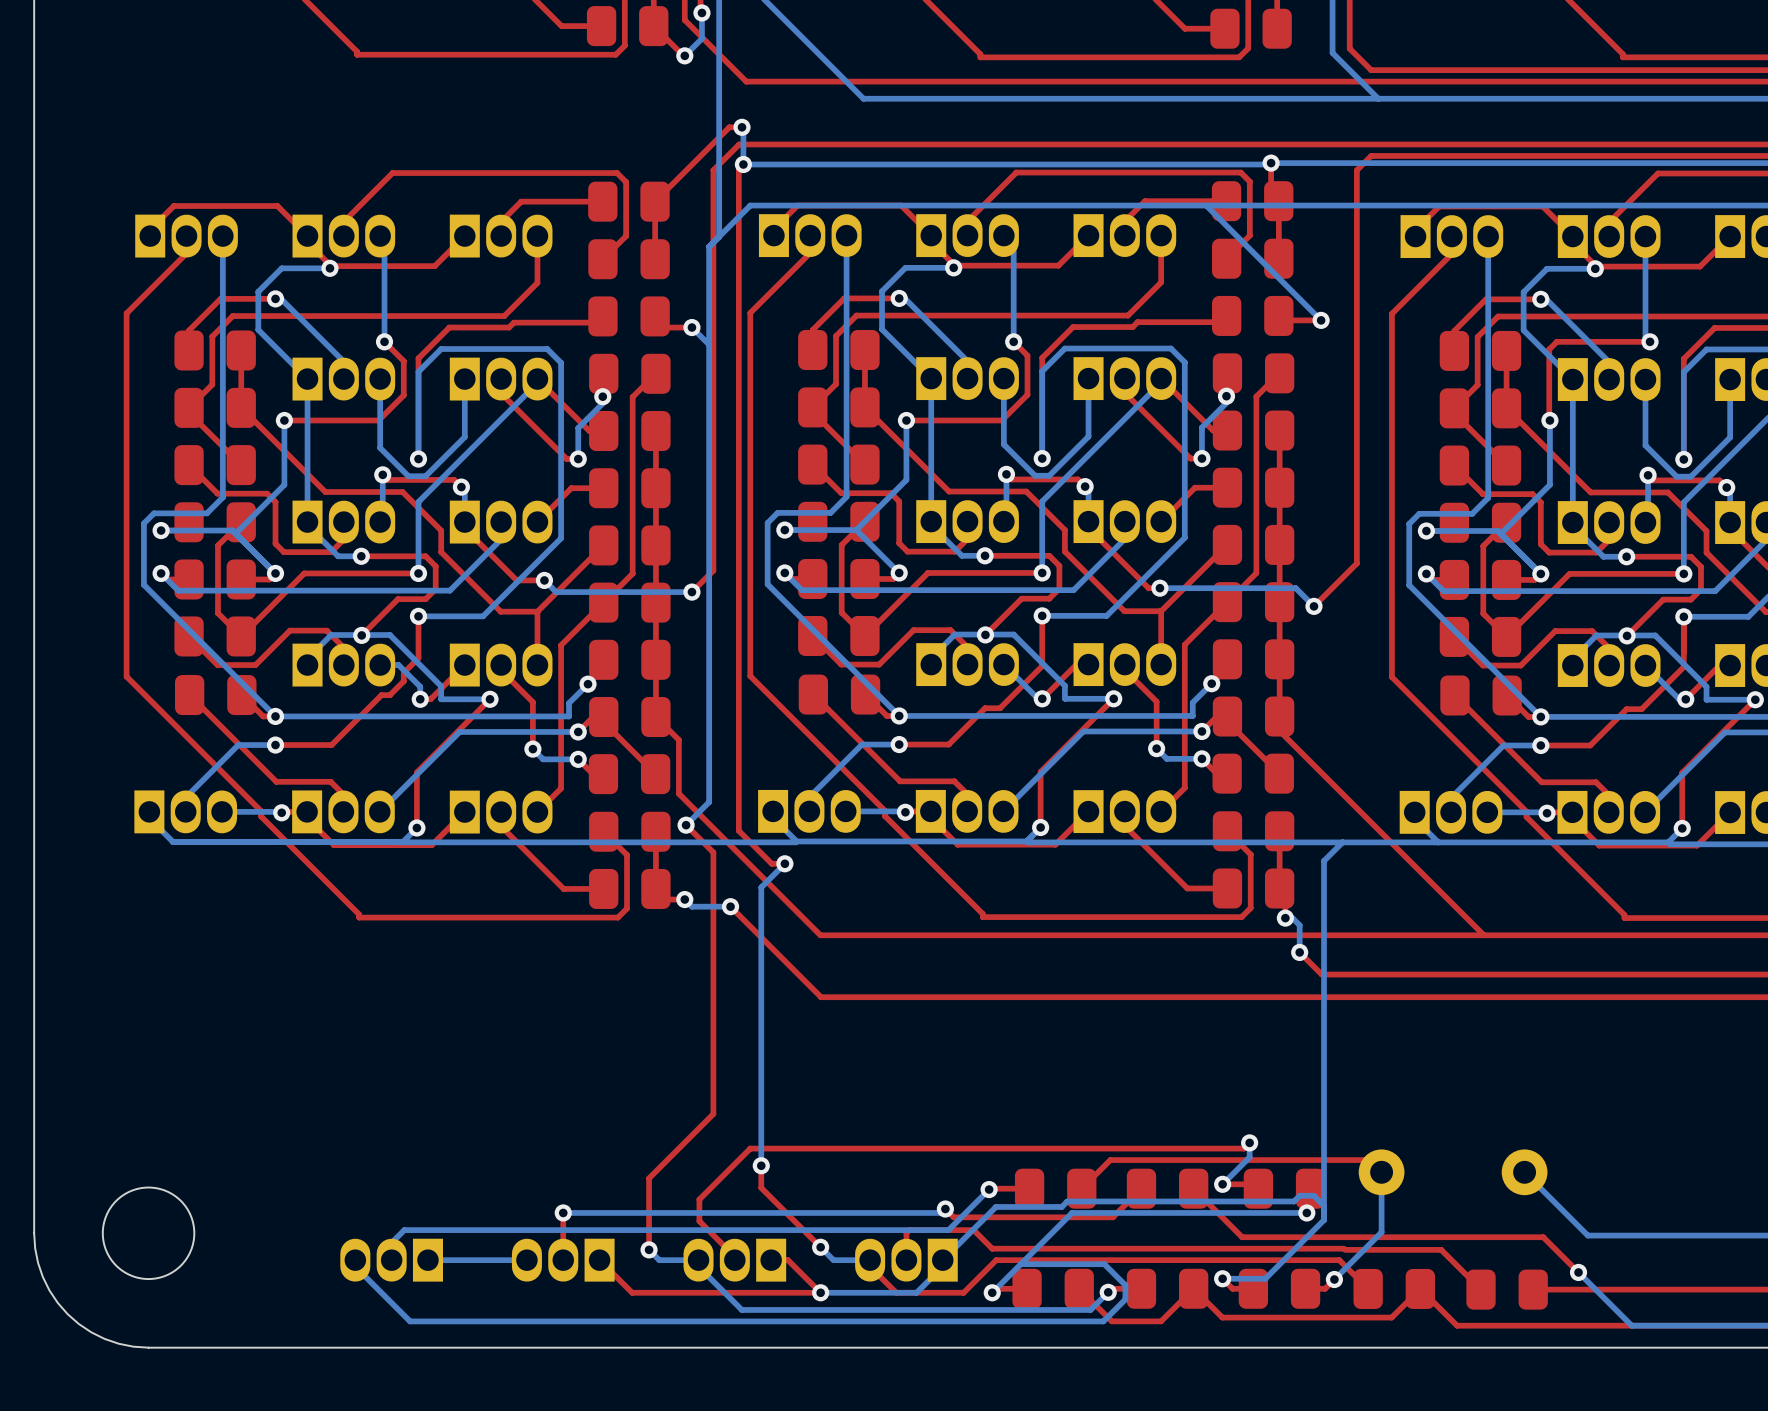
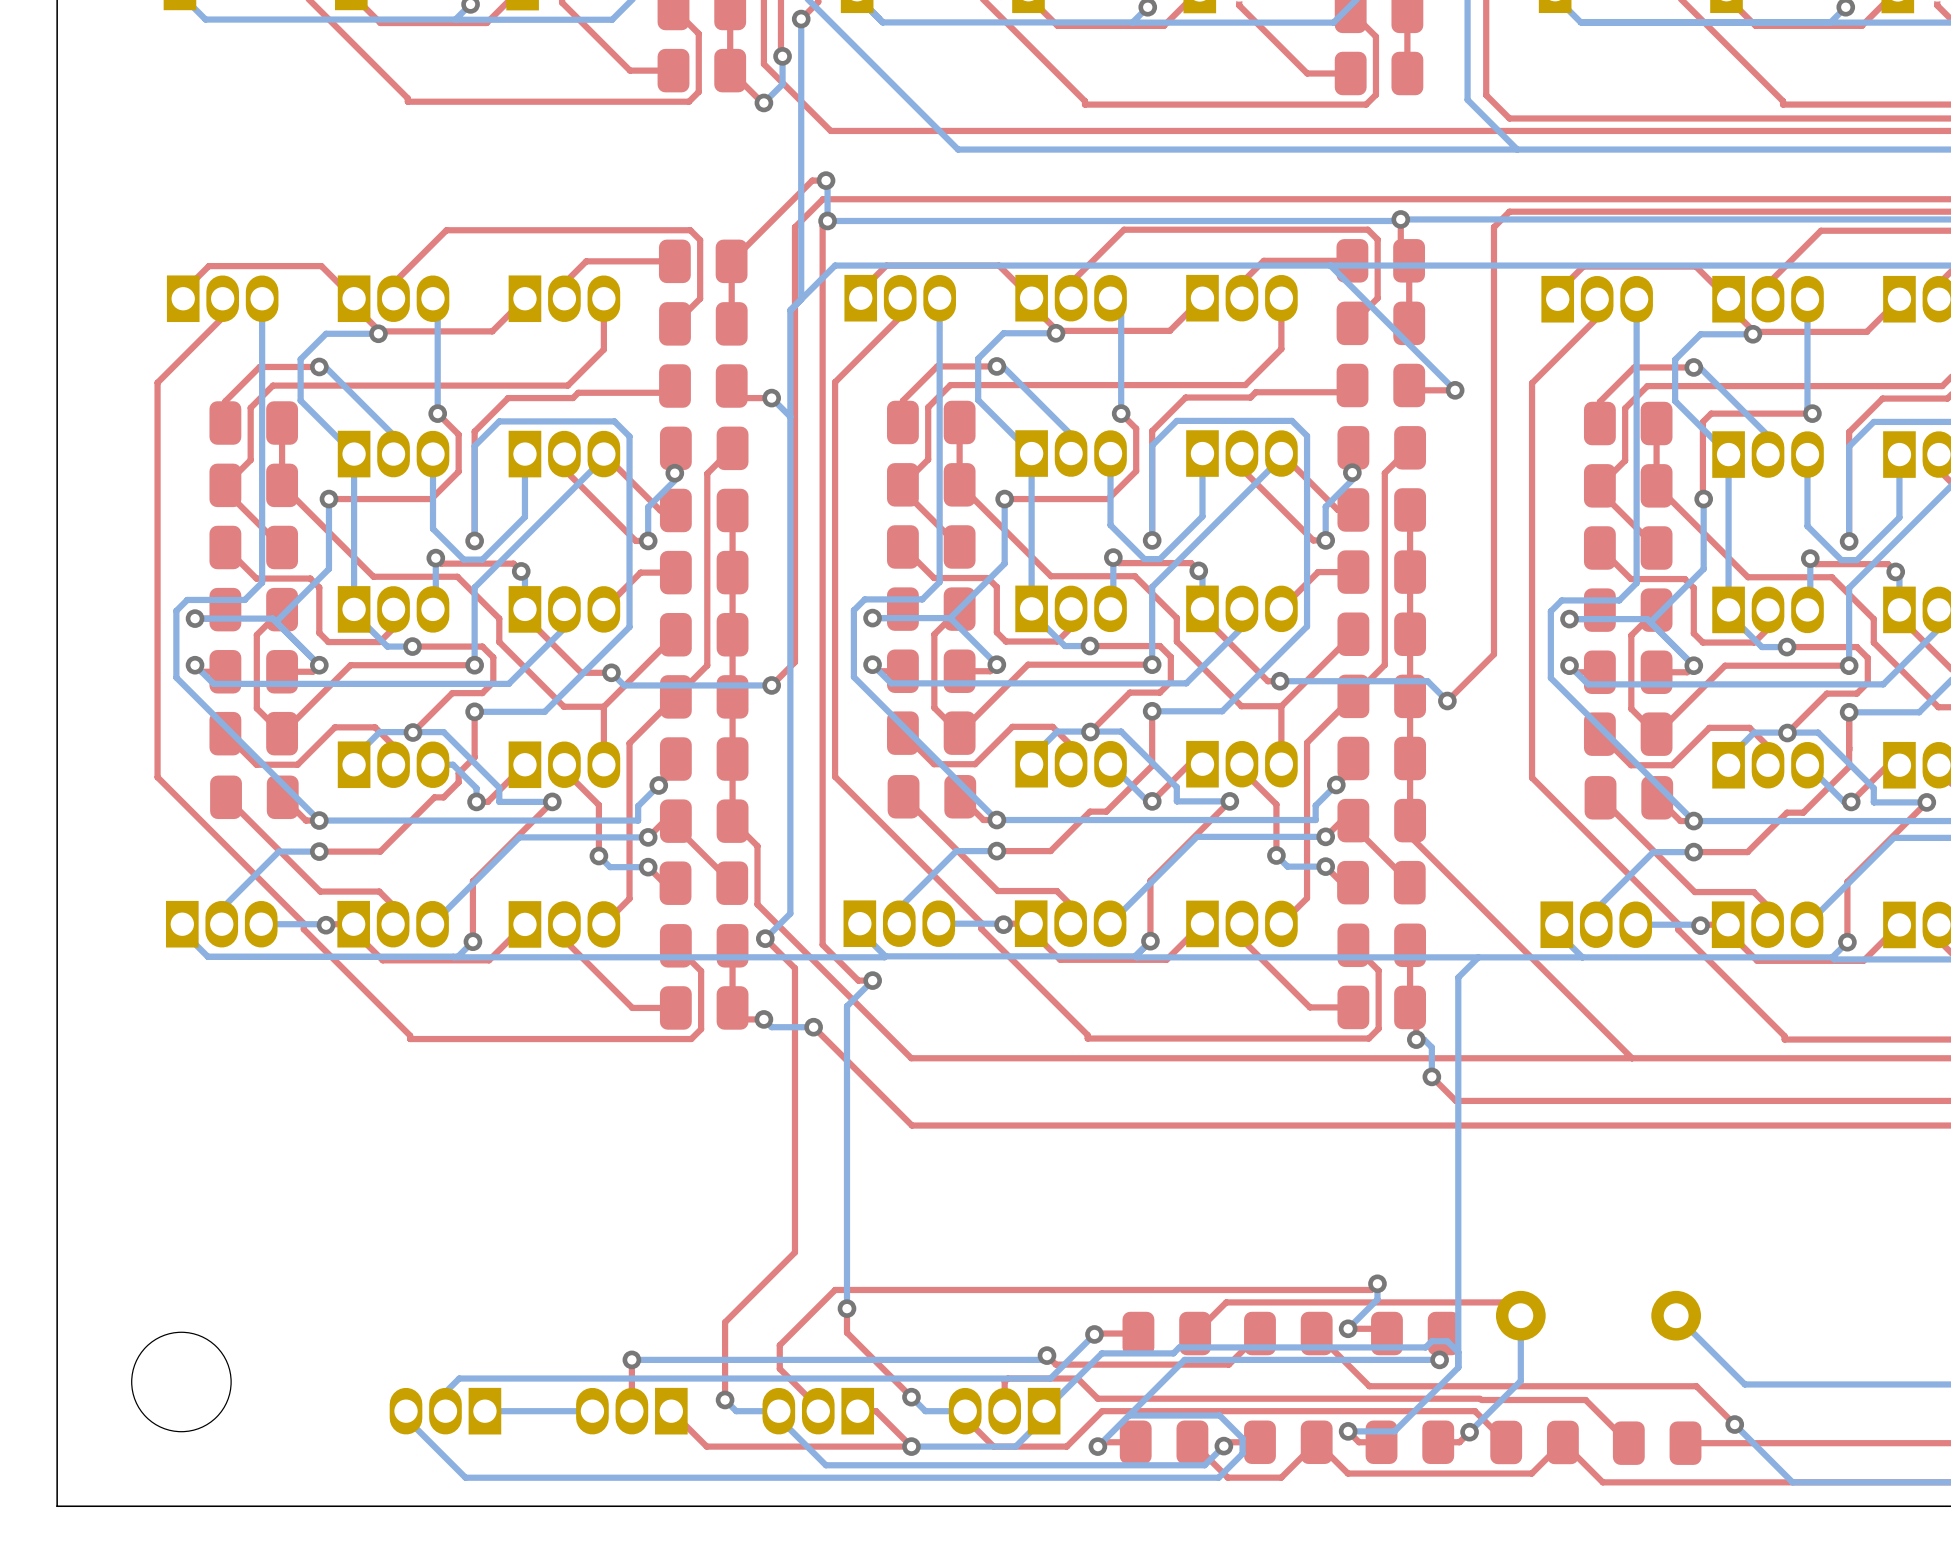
board edge: (34, 1233) (38, 1262) (42, 1277) (57, 1302) (67, 1314) (78, 1324) (104, 1338) (118, 1343) (148, 1347) -> (57, 1381) (57, 1506) (181, 1506)

